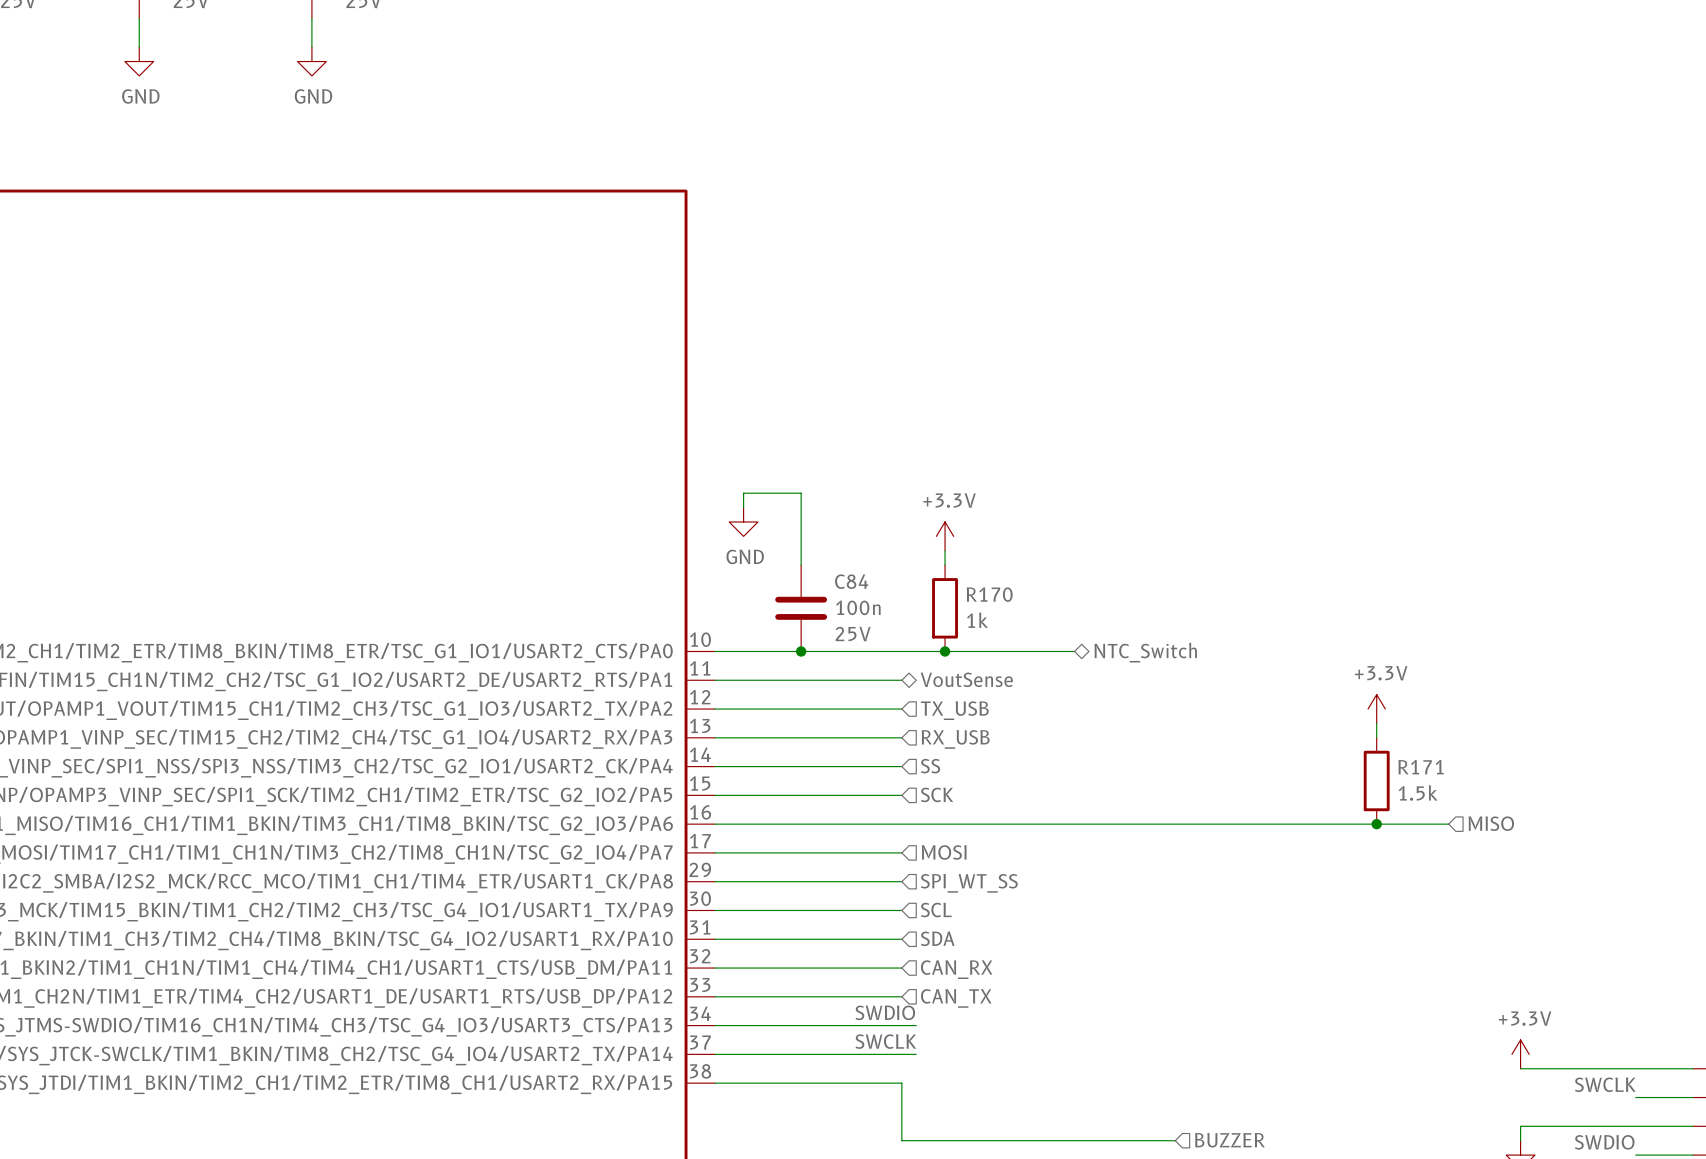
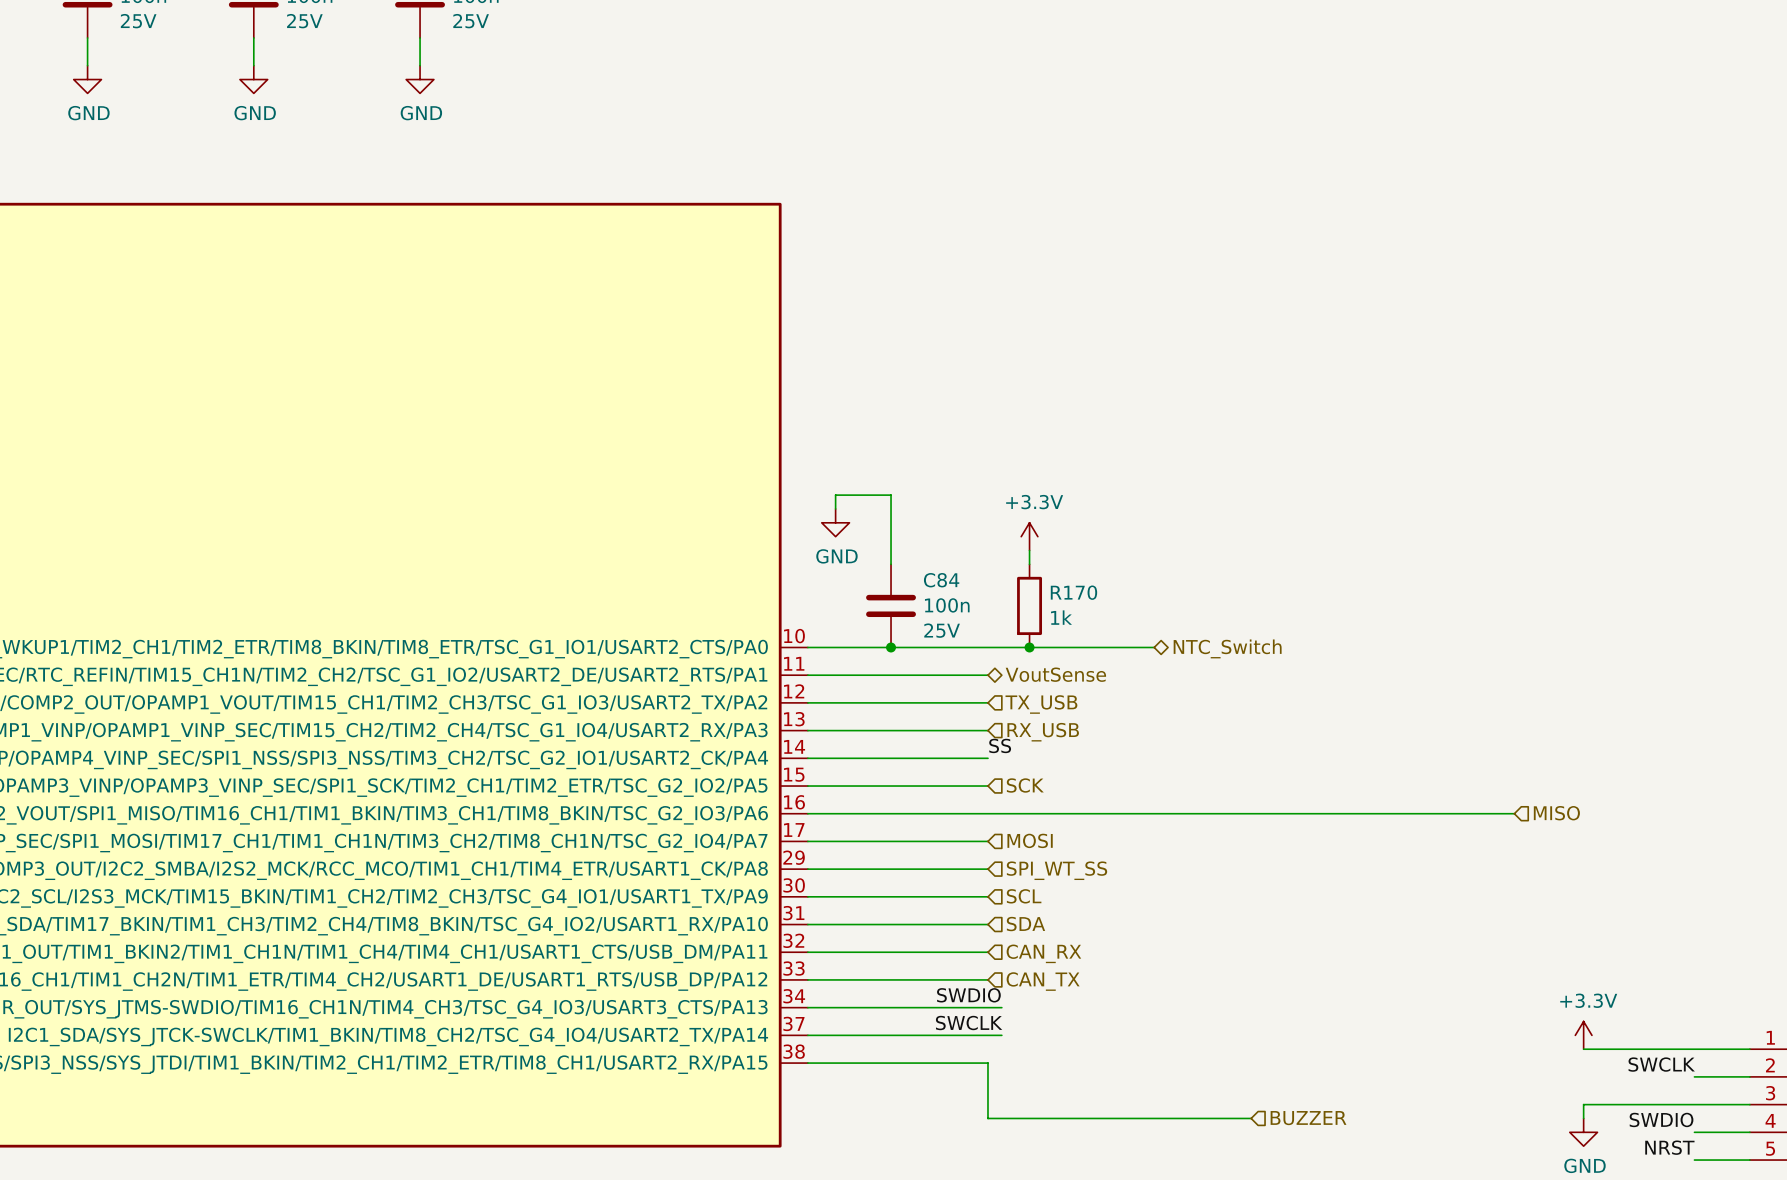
power symbol: +3.3V (1376, 709) -> none
wire: (1376, 723) (1376, 737) -> none
label: none -> SS (1000, 745)
hierarchical label: SS (930, 766) -> none
R171: 1.5k (1376, 780) -> none
junction: (1376, 824) -> none

